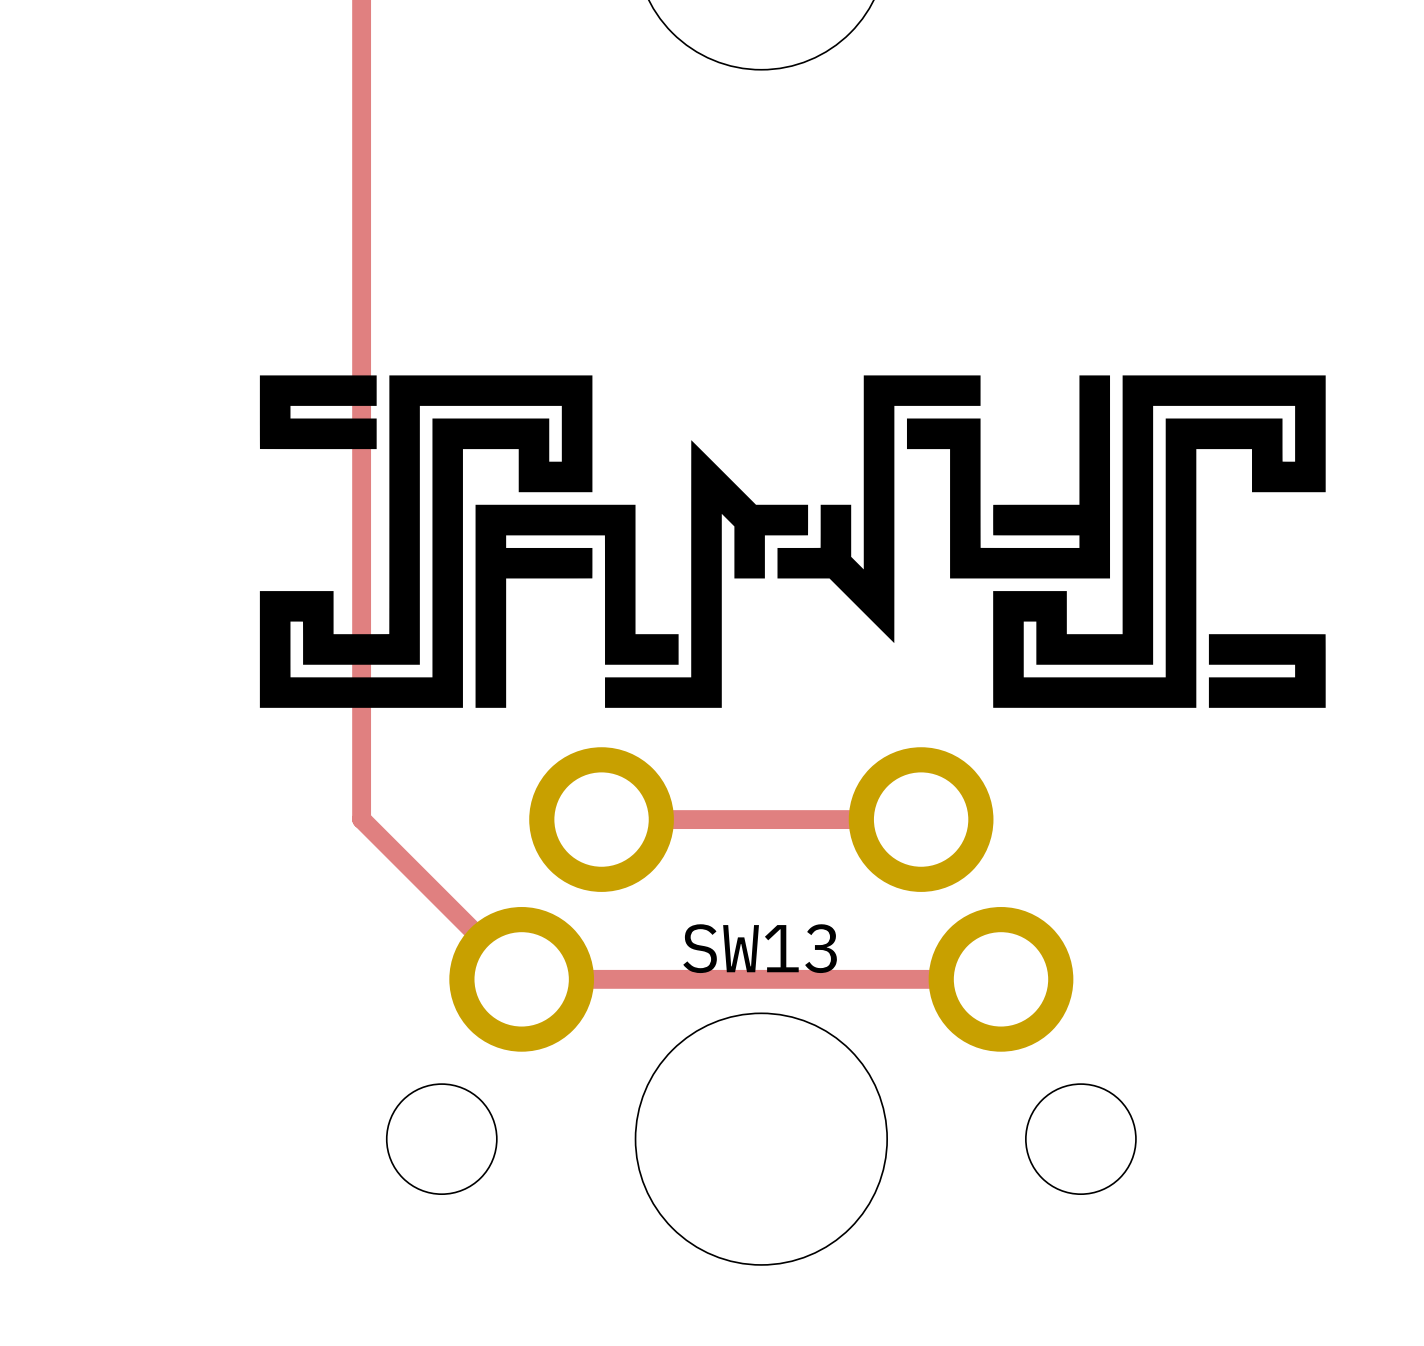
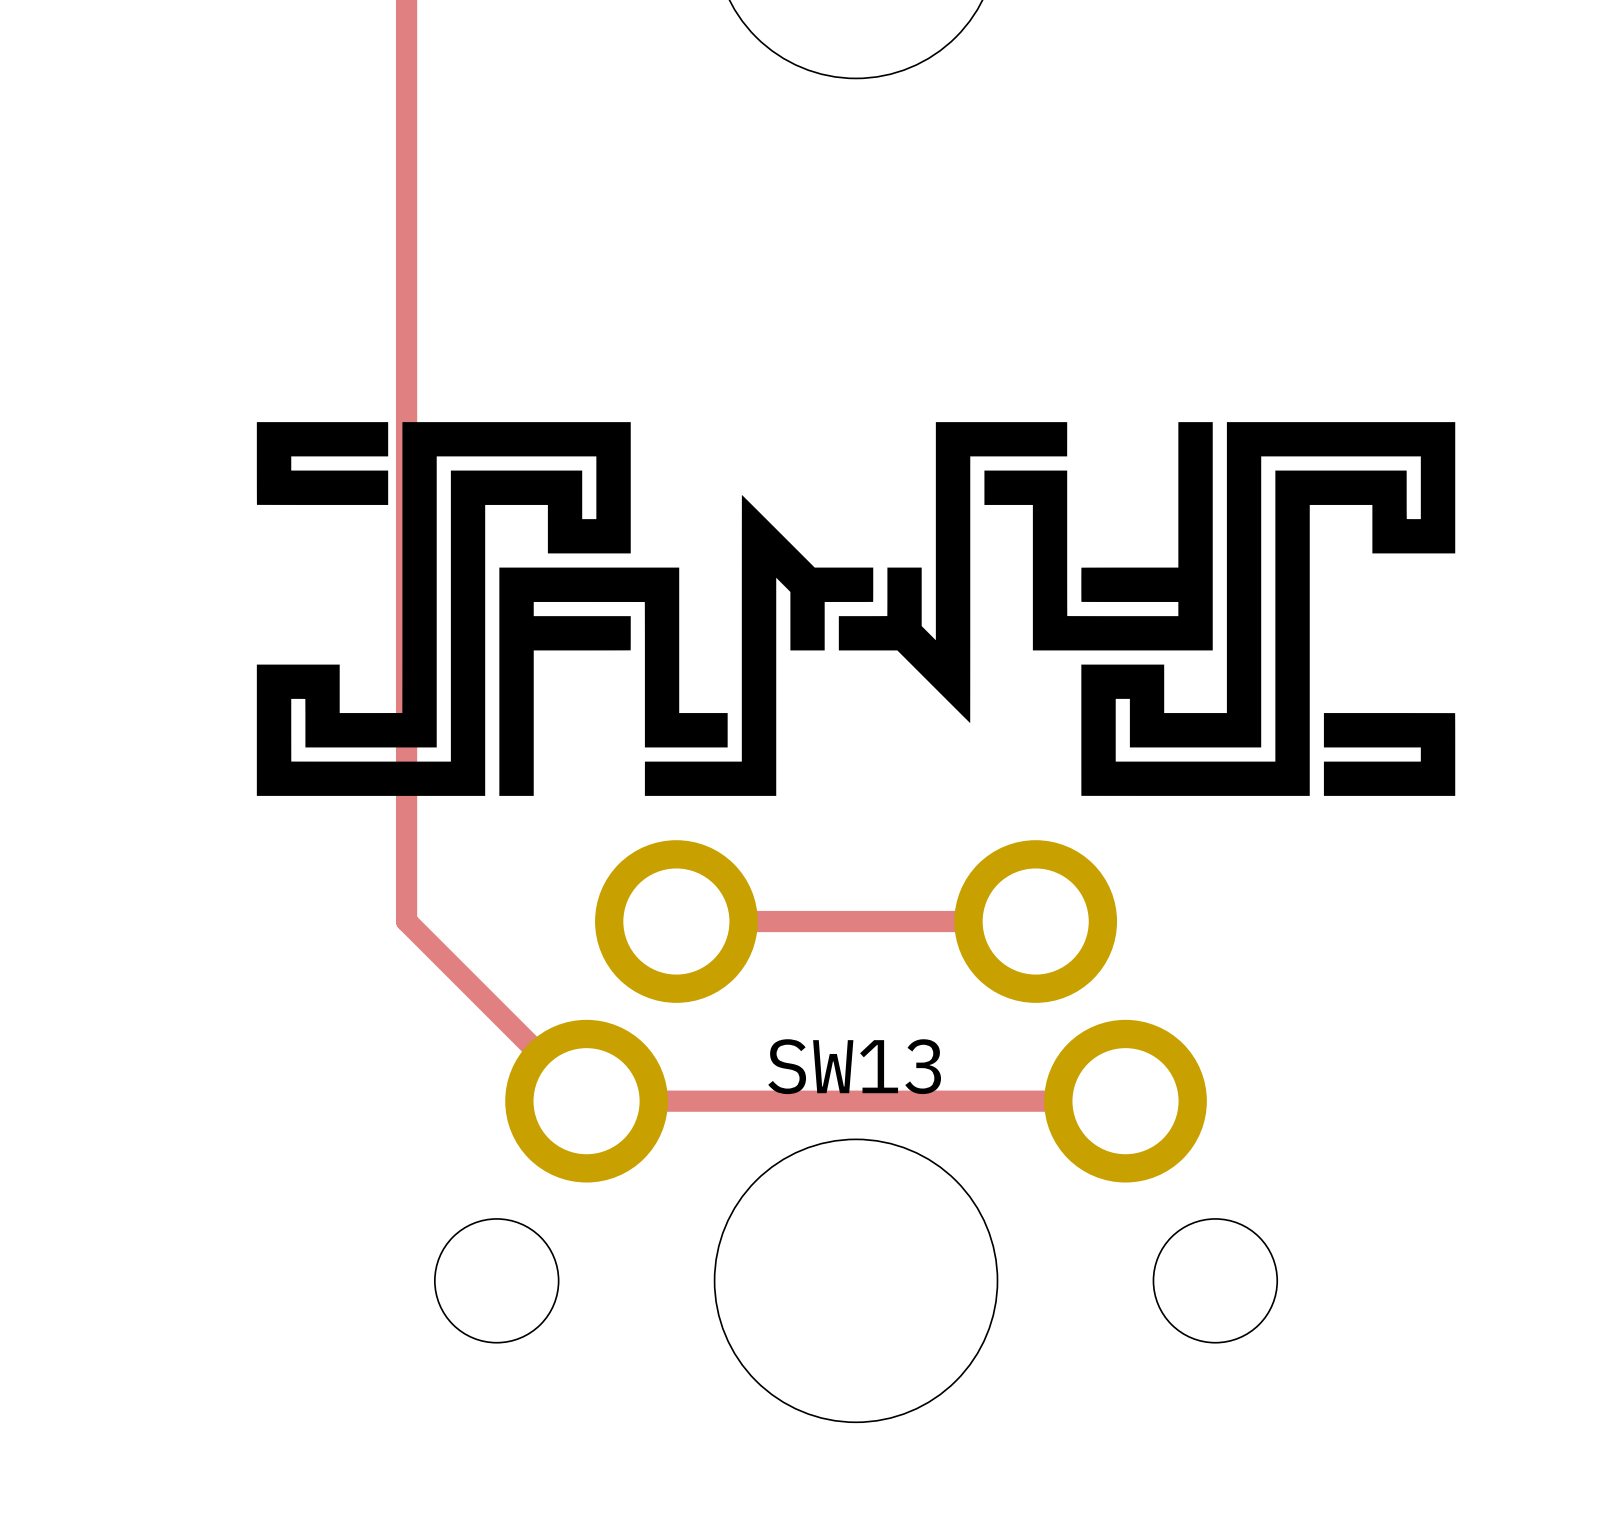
drawing position: (792, 541) -> (856, 609)

